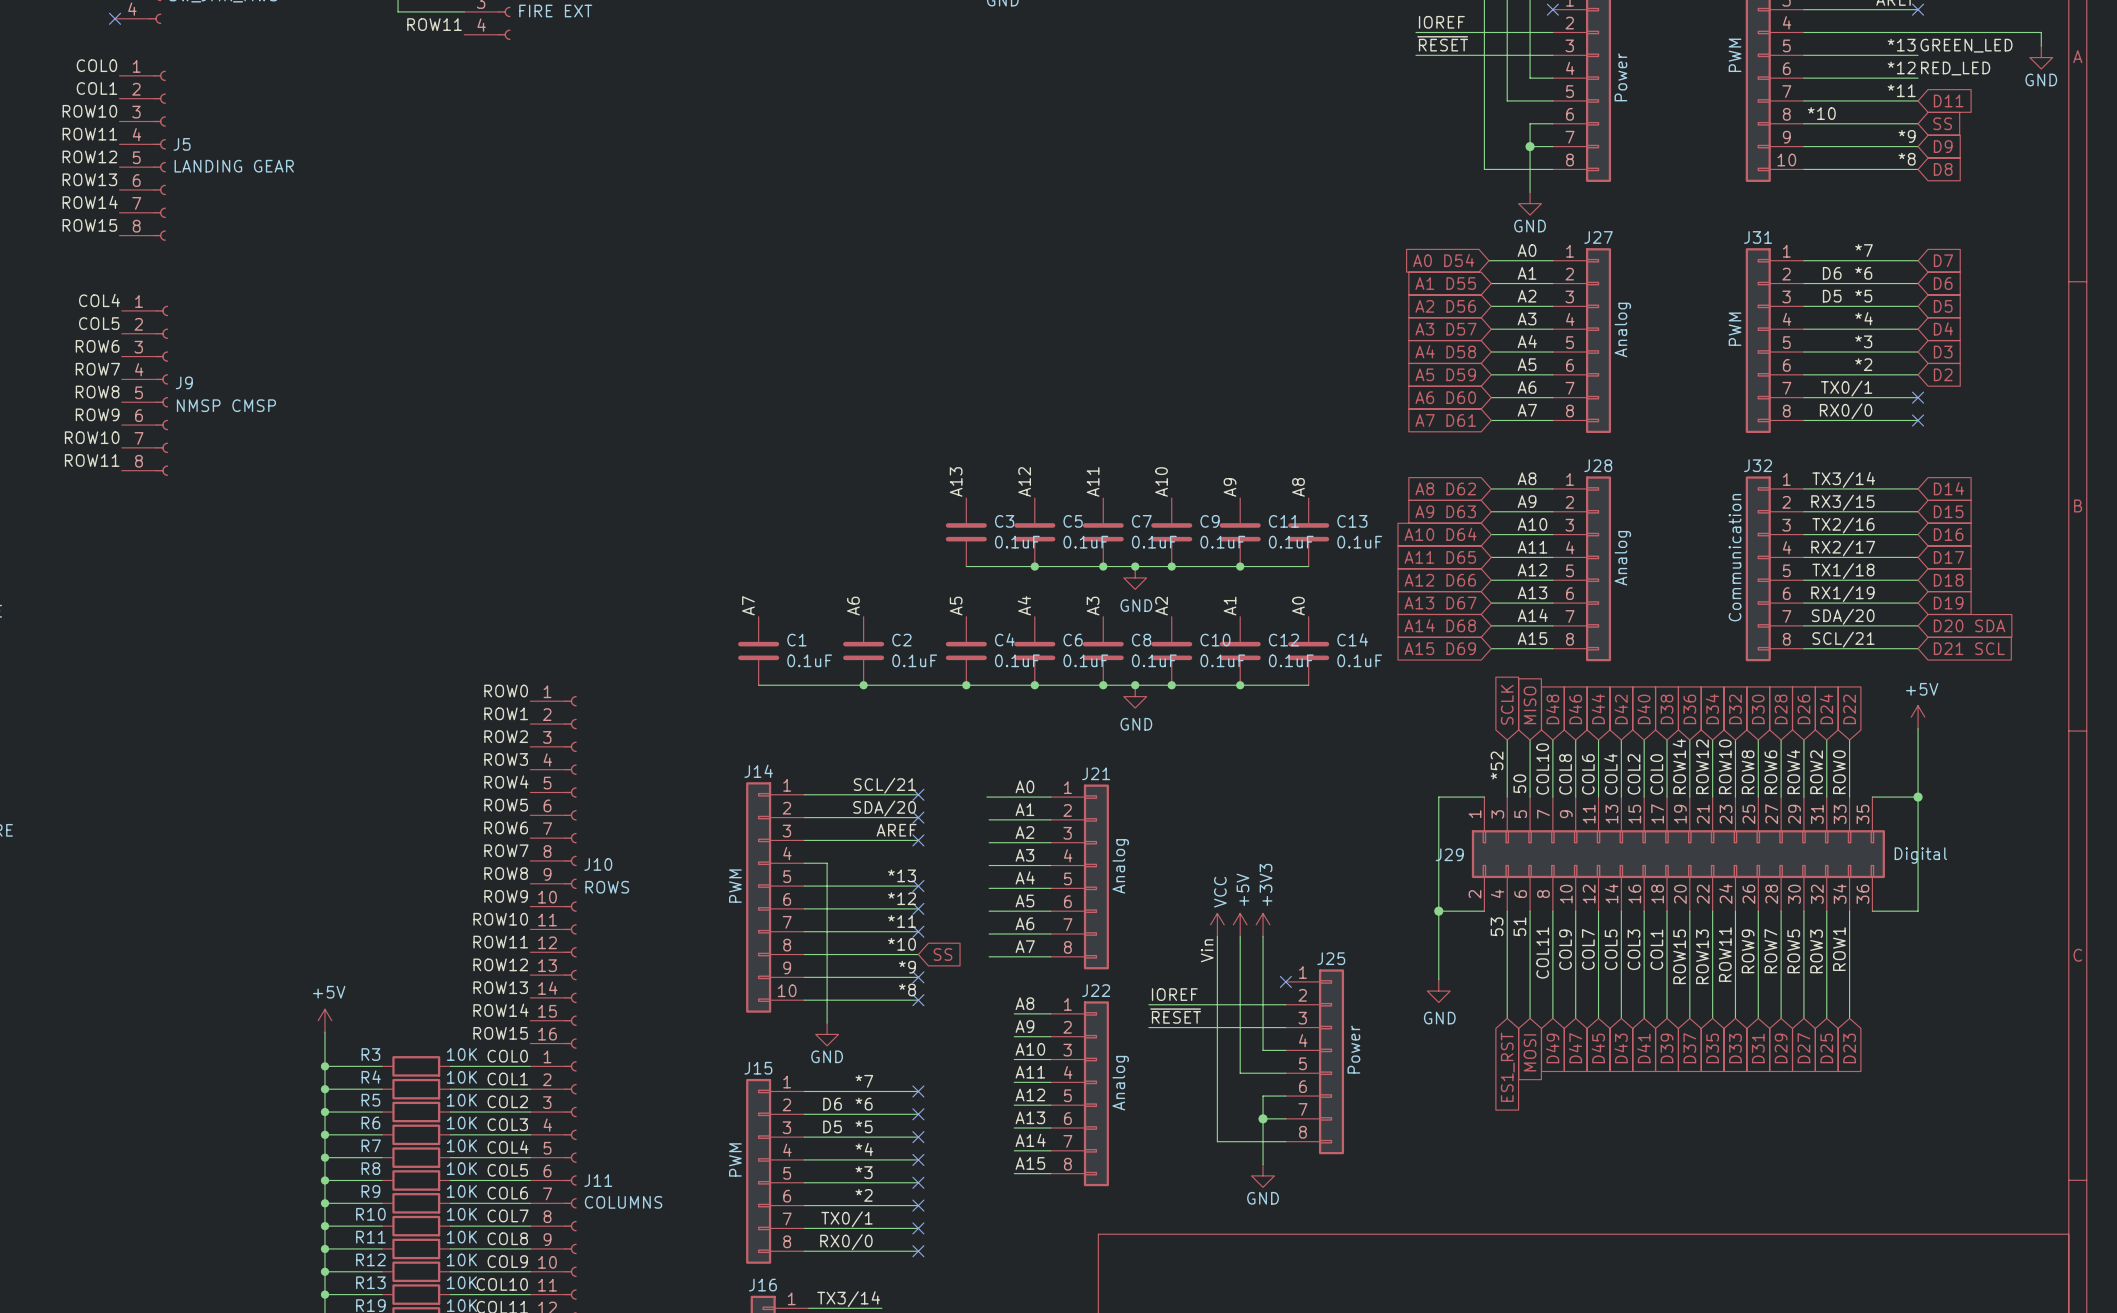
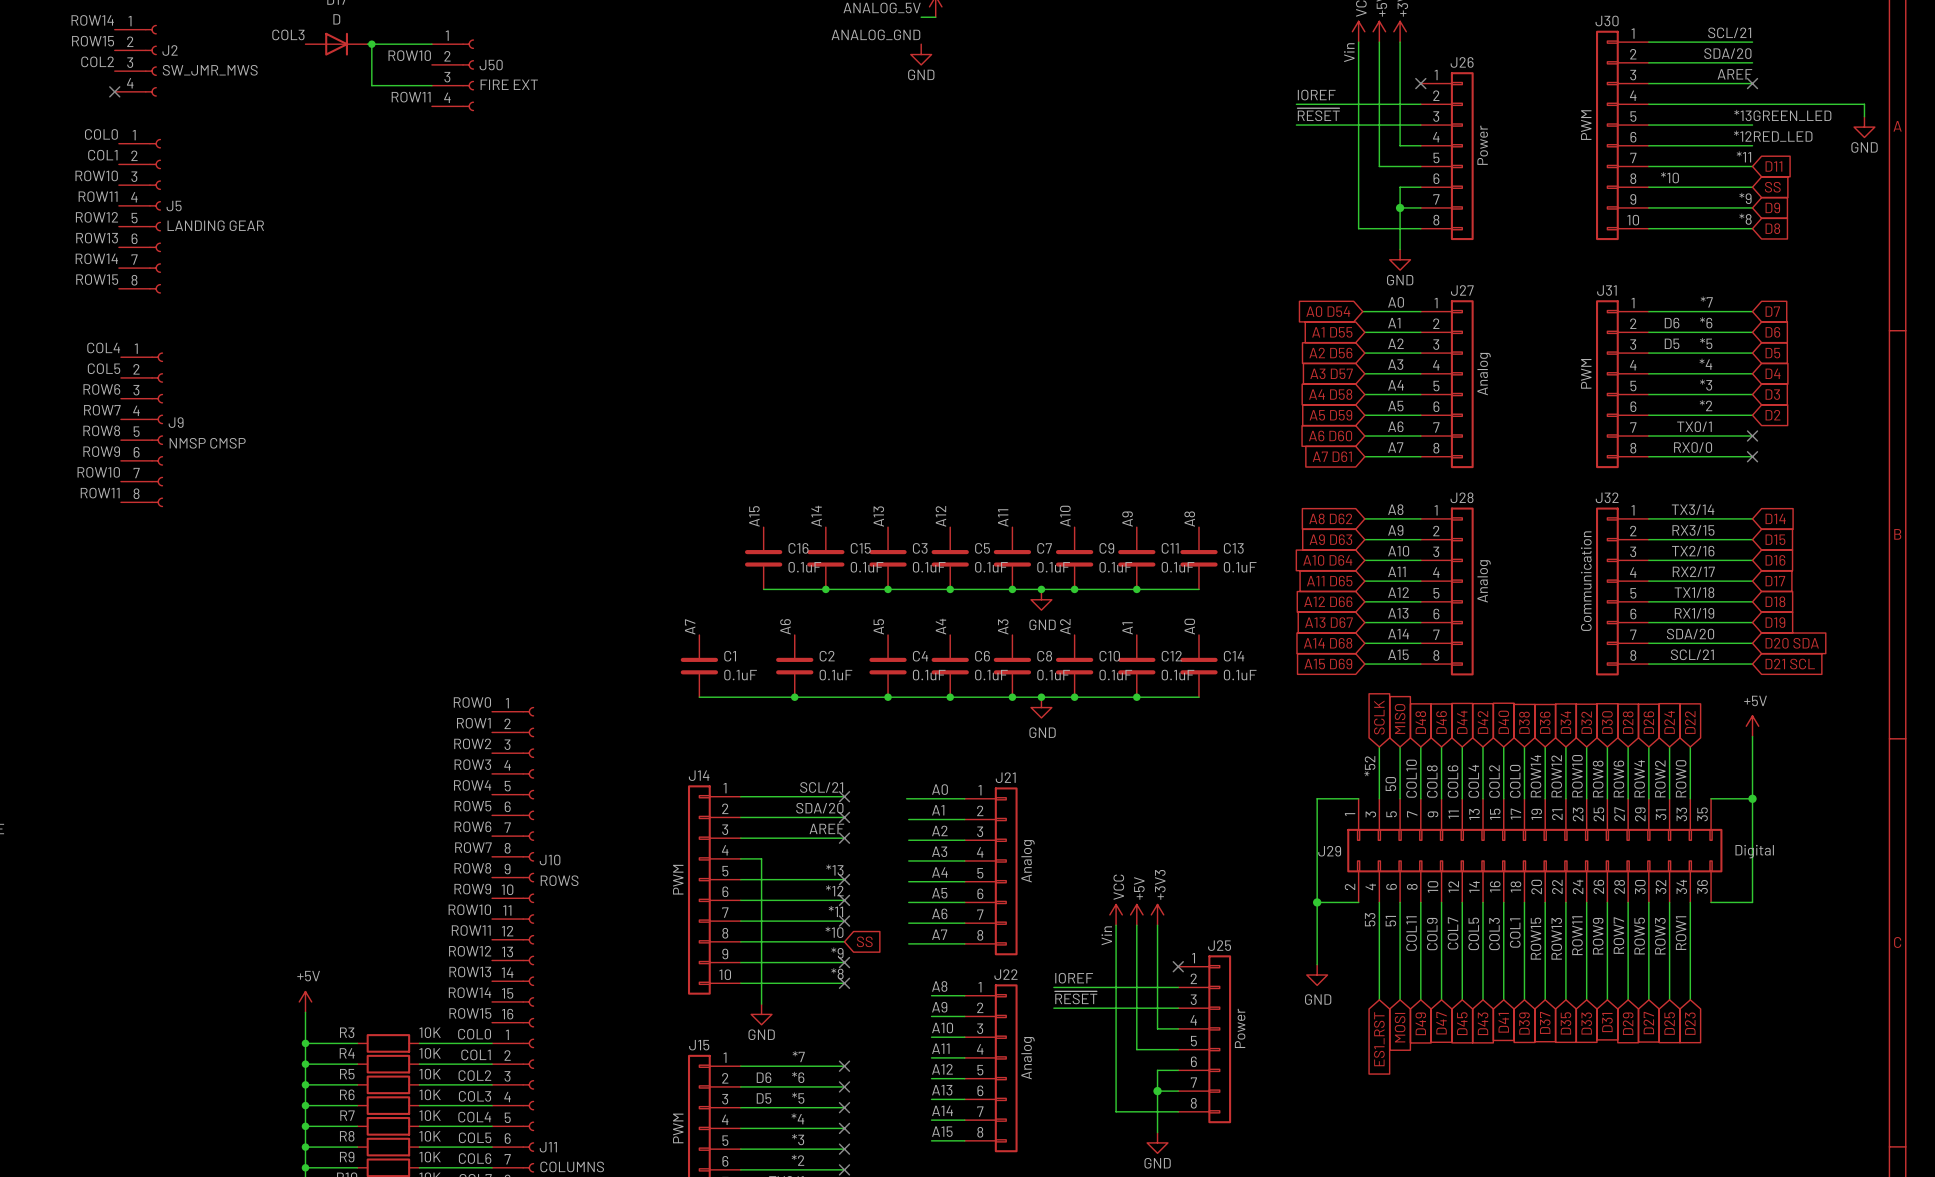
label: none -> A15 (754, 516)
label: none -> A14 (816, 516)
C16: none -> 0.1uF (763, 558)
C15: none -> 0.1uF (825, 558)
wire: none -> (763, 589) (888, 589)
junction: none -> (825, 589)
junction: none -> (888, 589)

